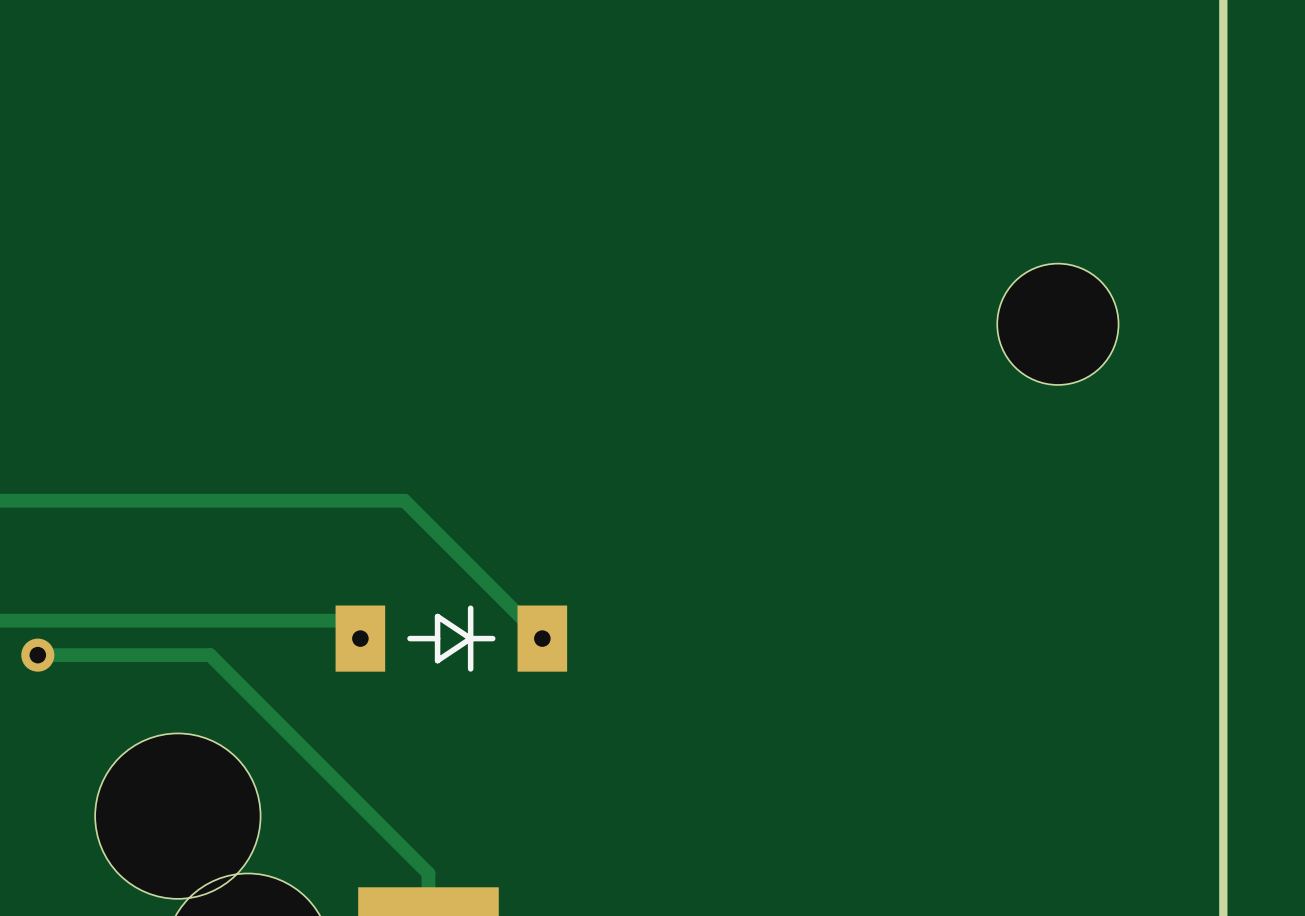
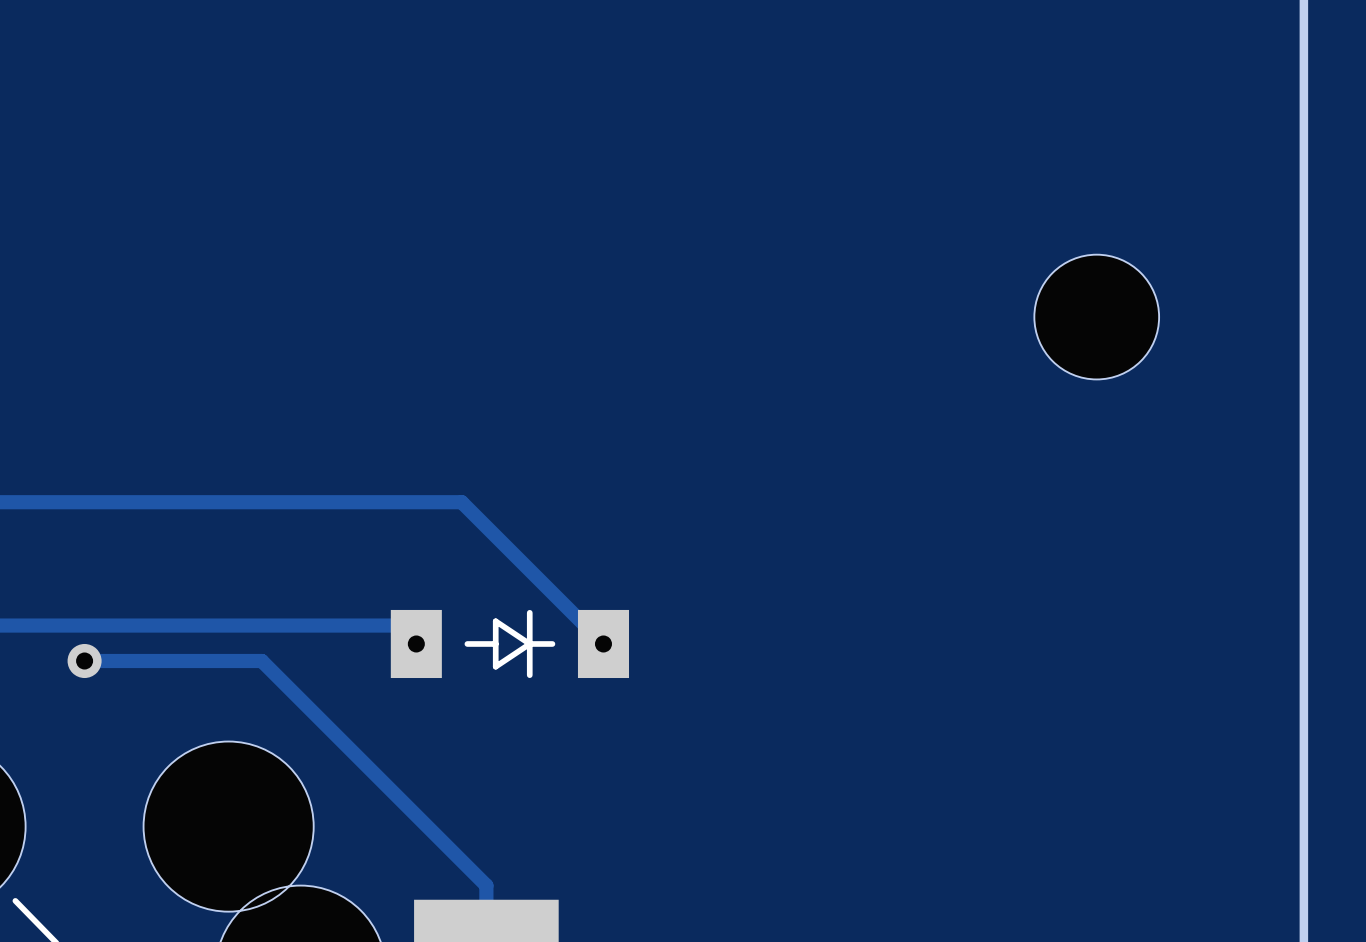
part position: (1057, 324) -> (1096, 317)

